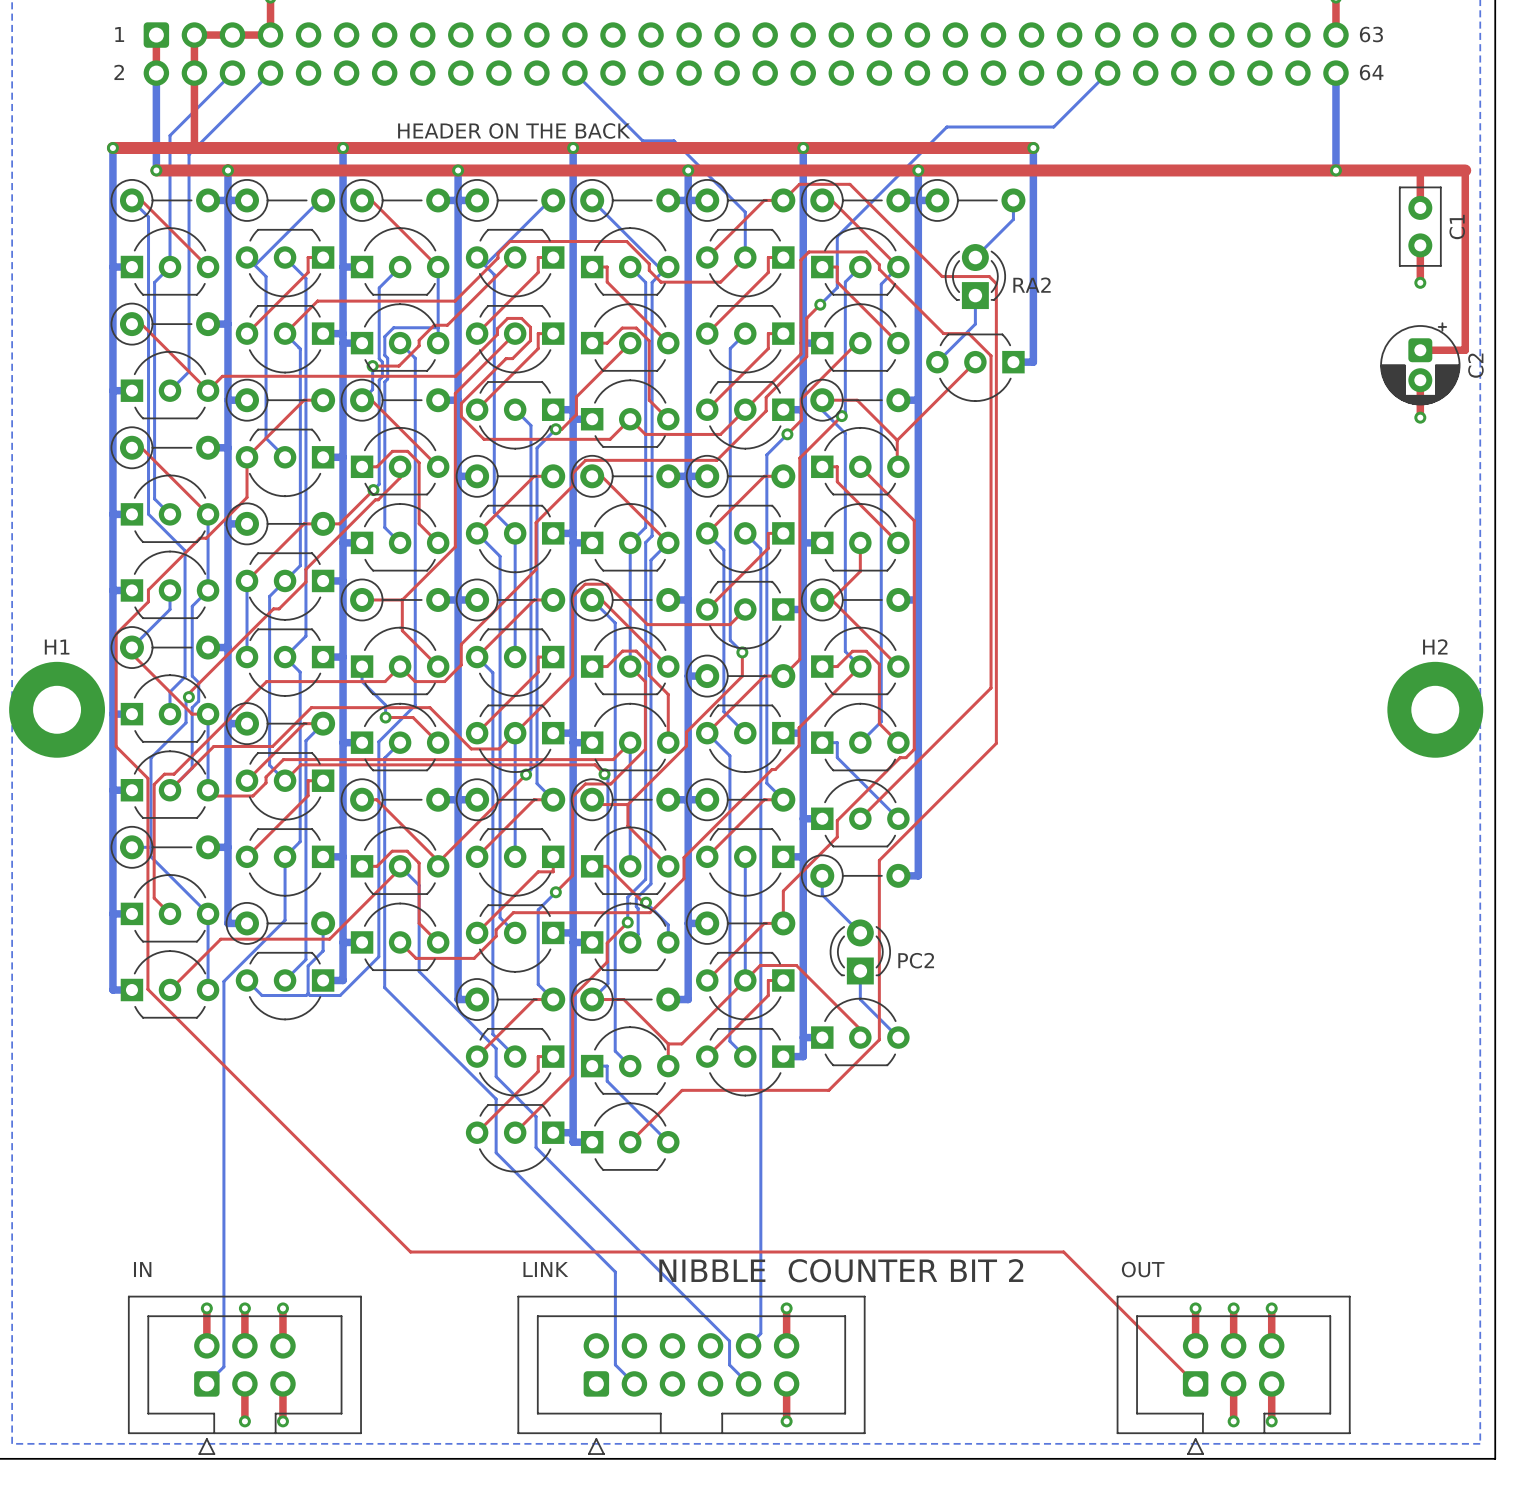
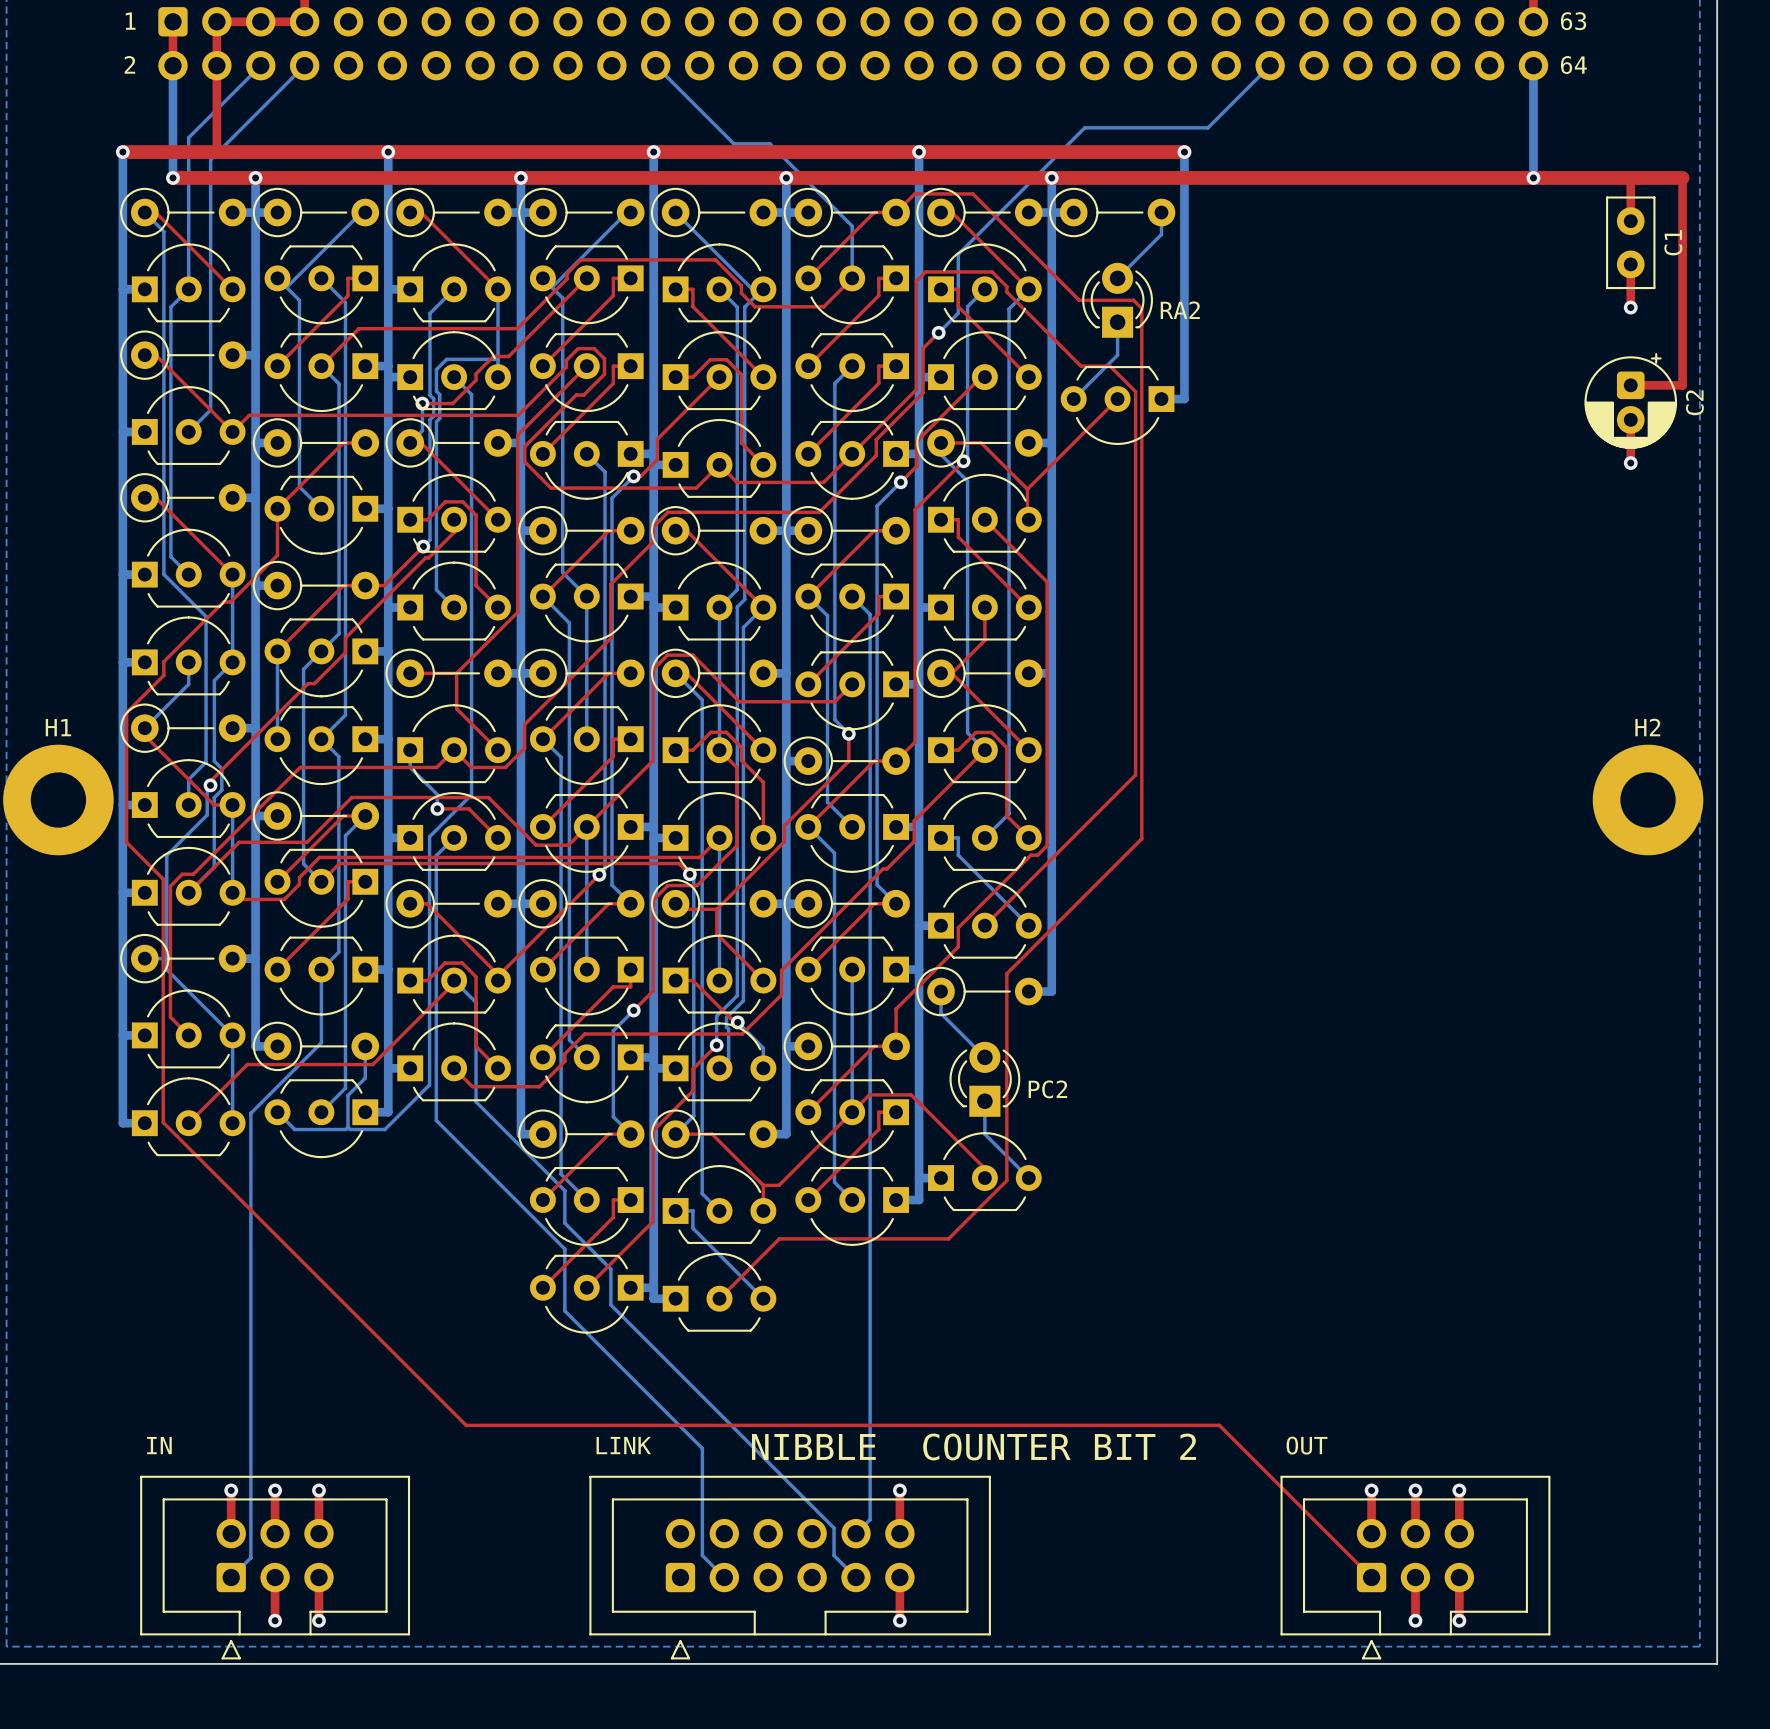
text: HEADER ON THE BACK (514, 130) -> none

